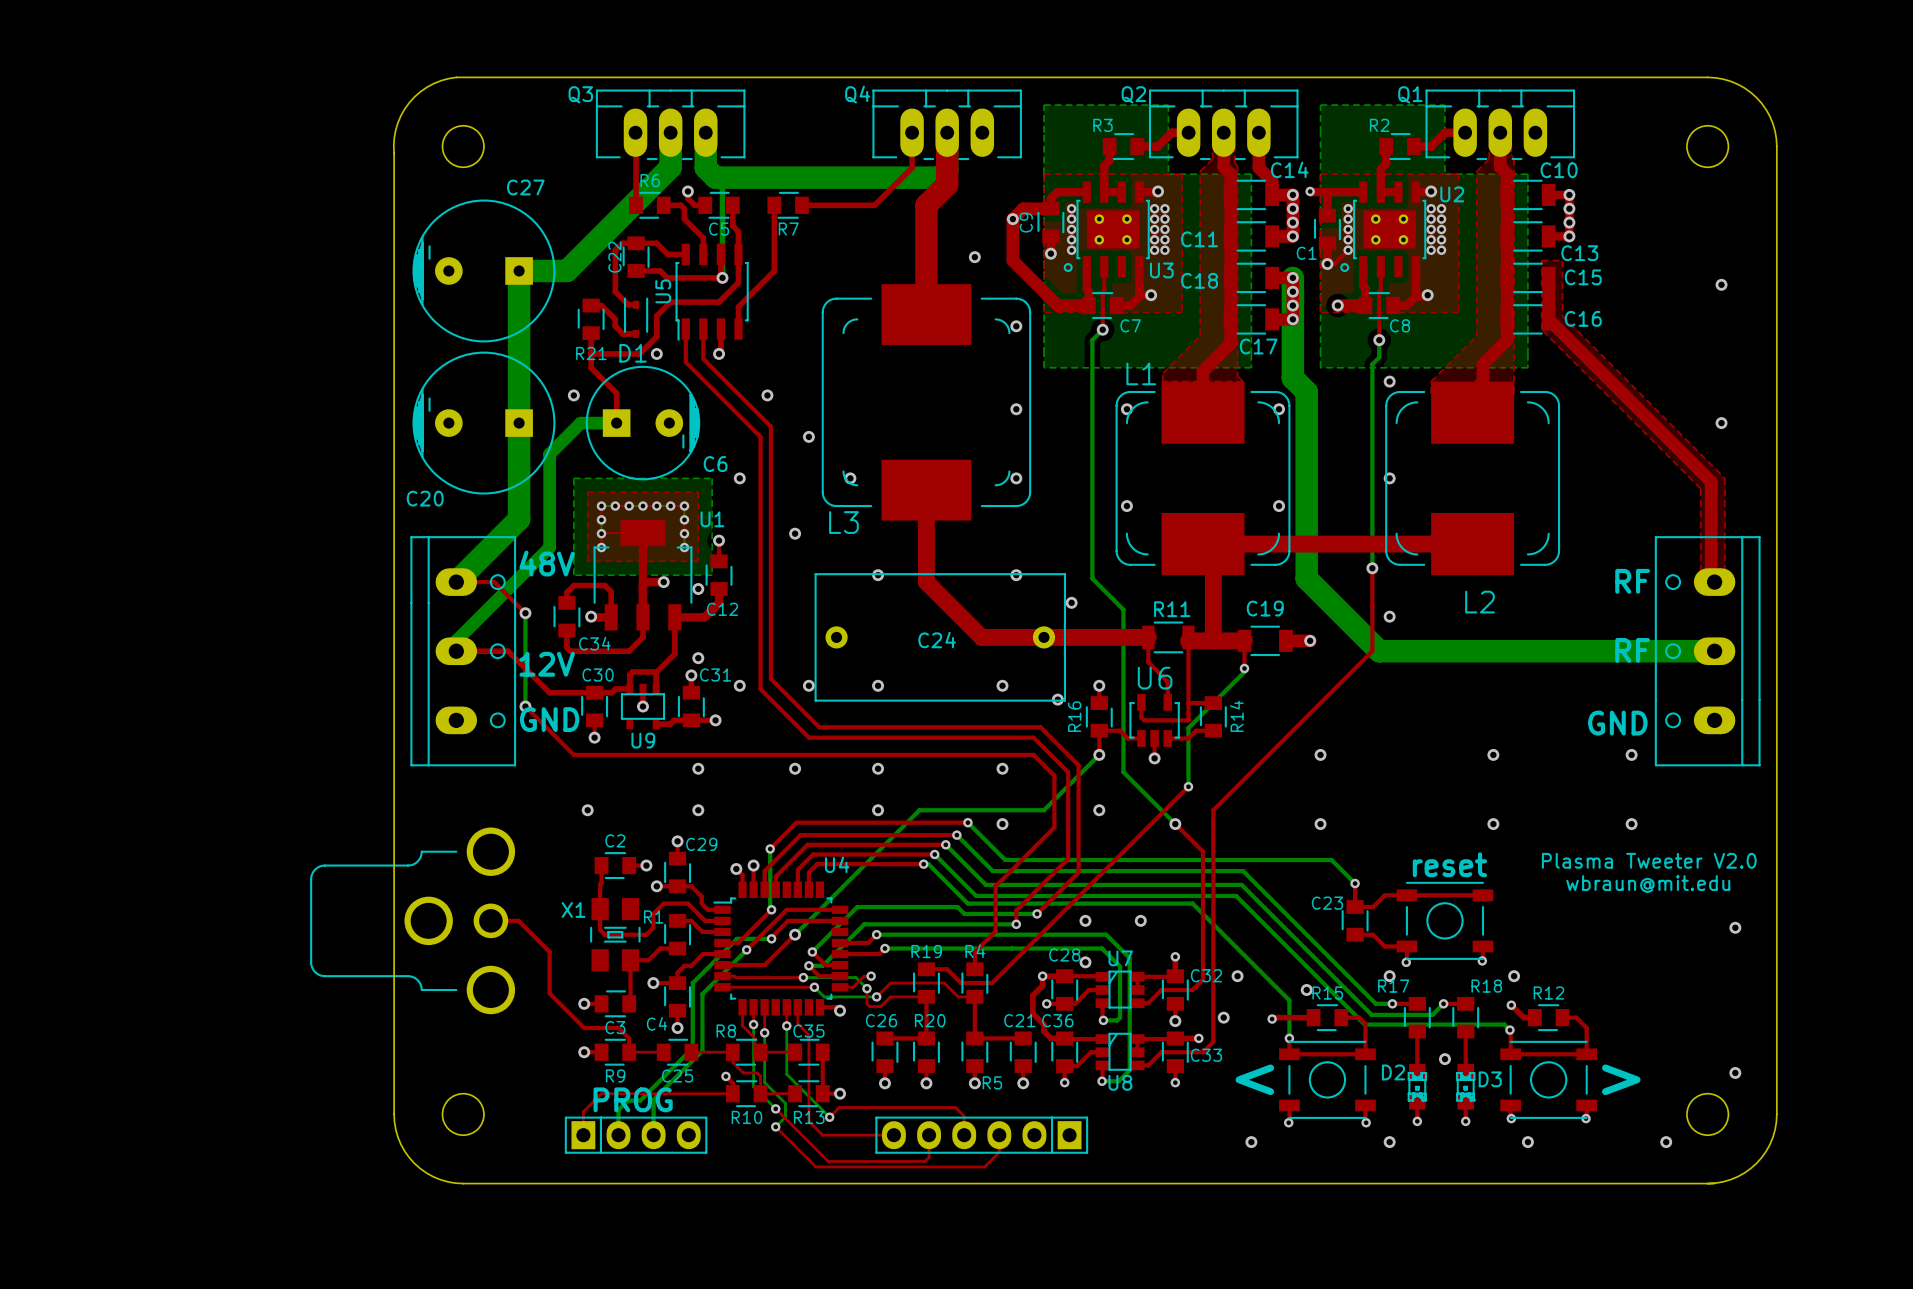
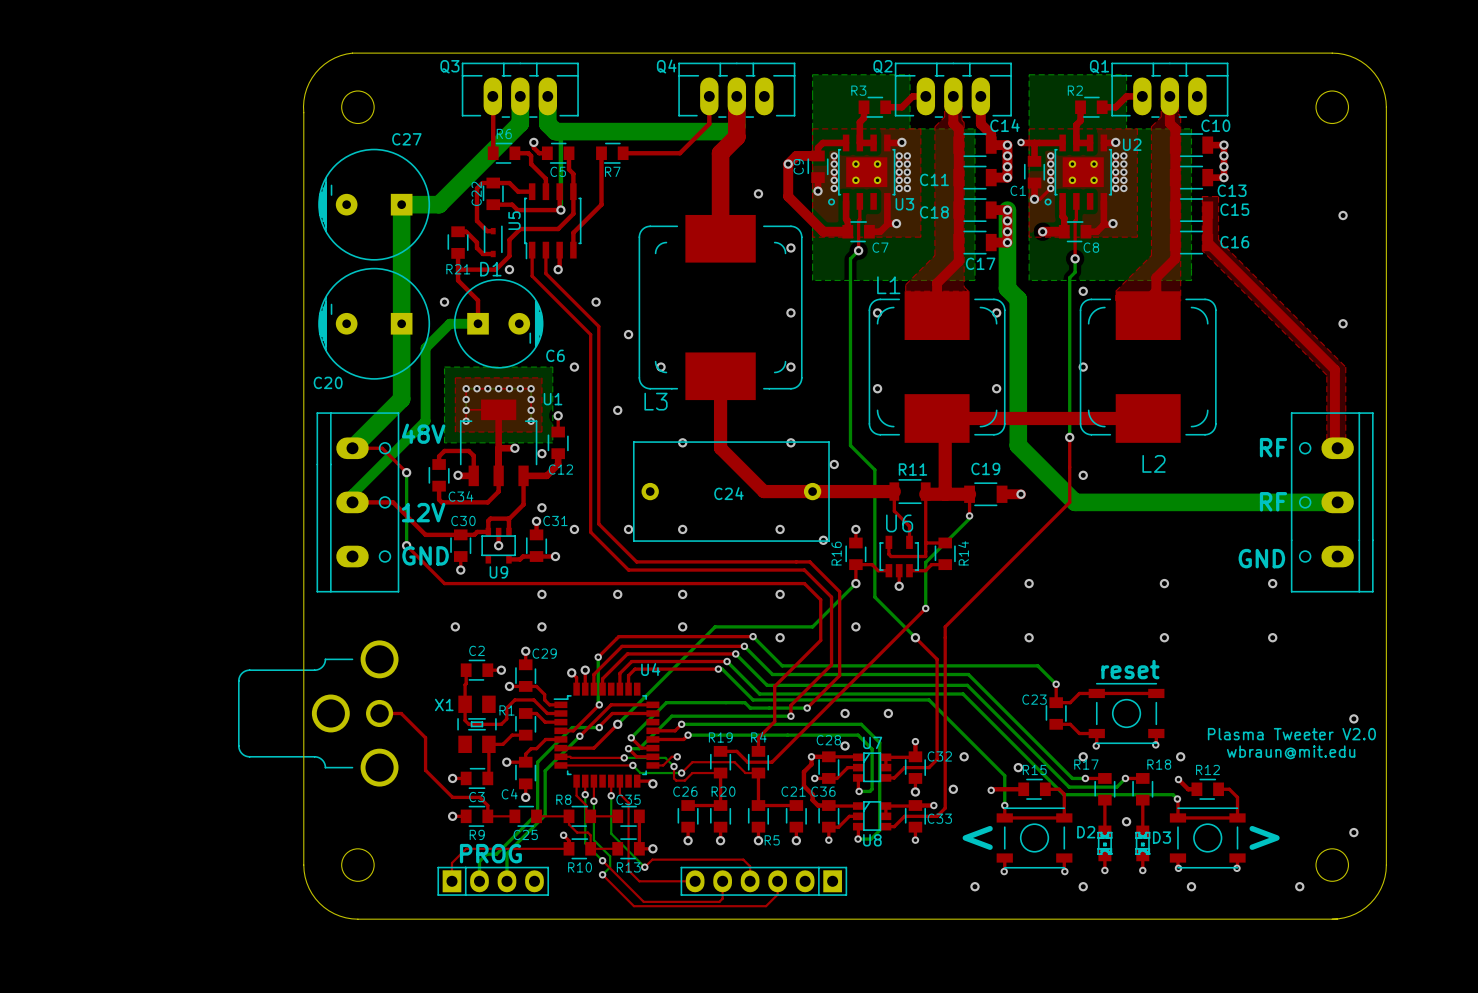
text position: Plasma Tweeter V2.0 (1649, 860) -> Plasma Tweeter V2.0 (1291, 734)
text position: wbraun@mit.edu (1648, 884) -> wbraun@mit.edu (1291, 752)

